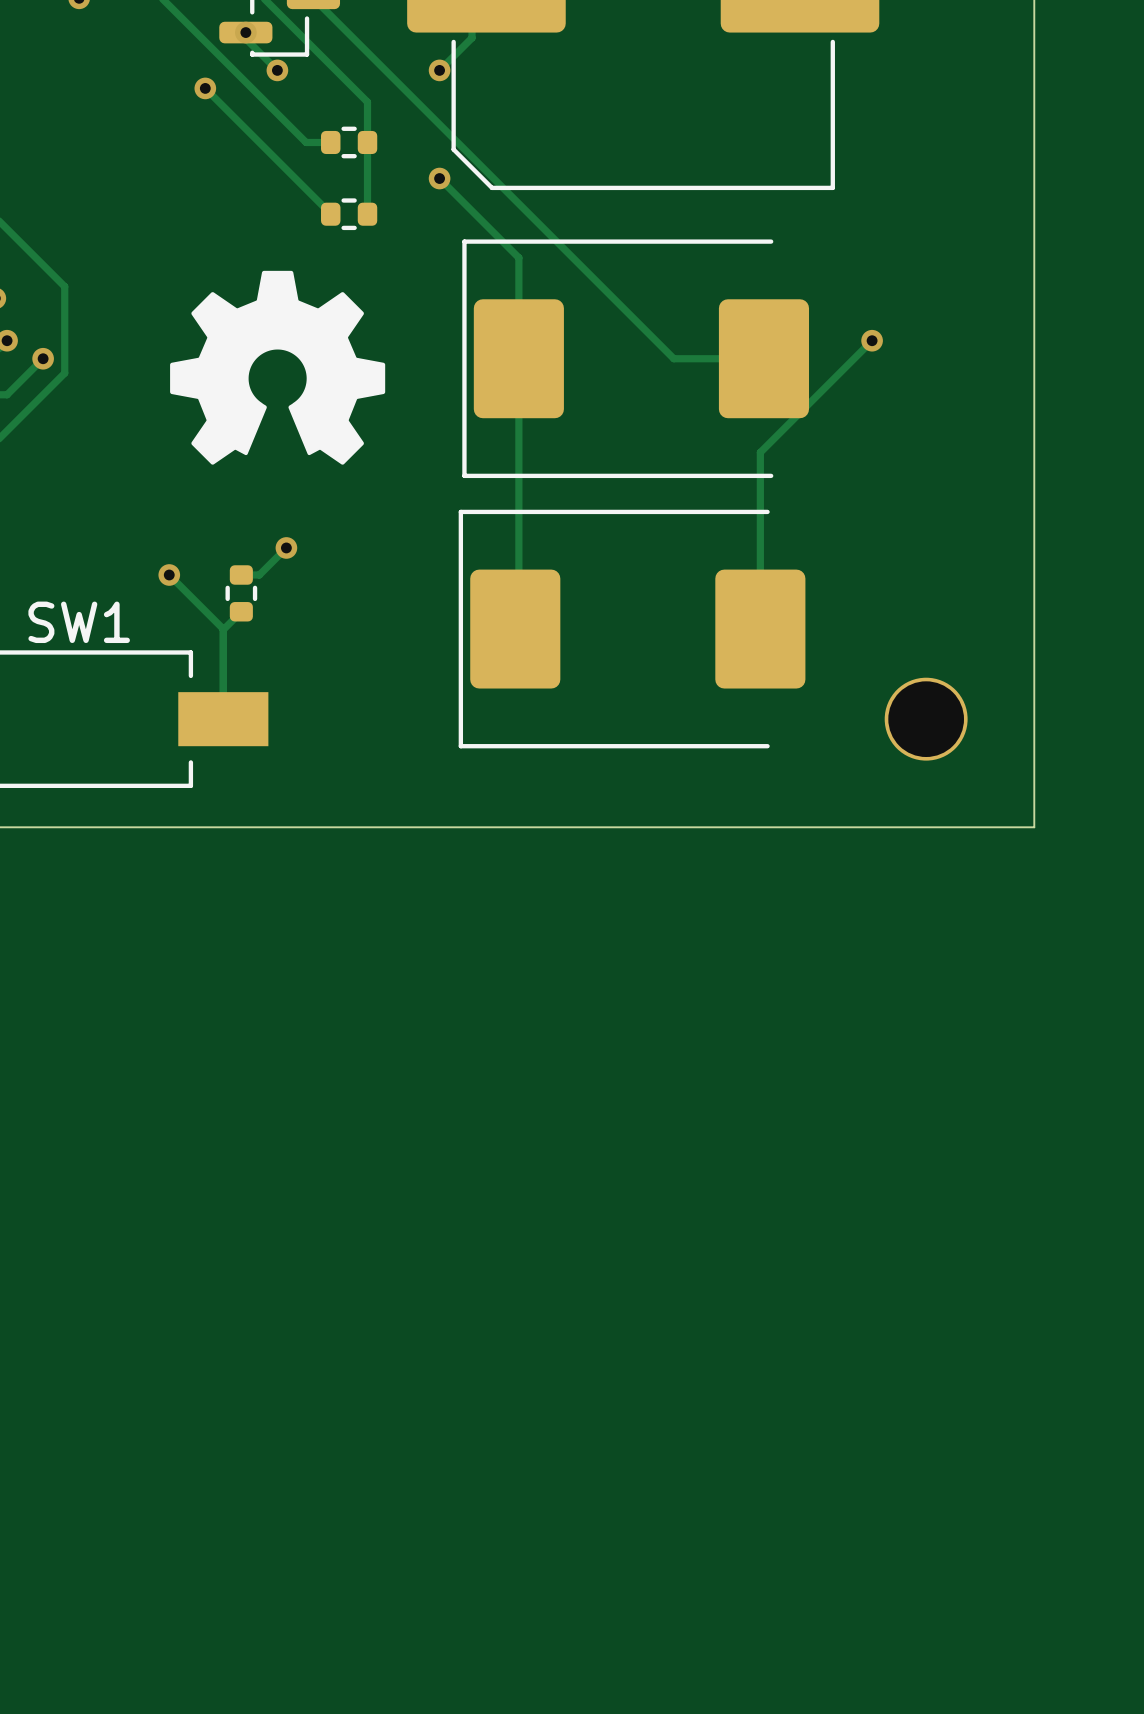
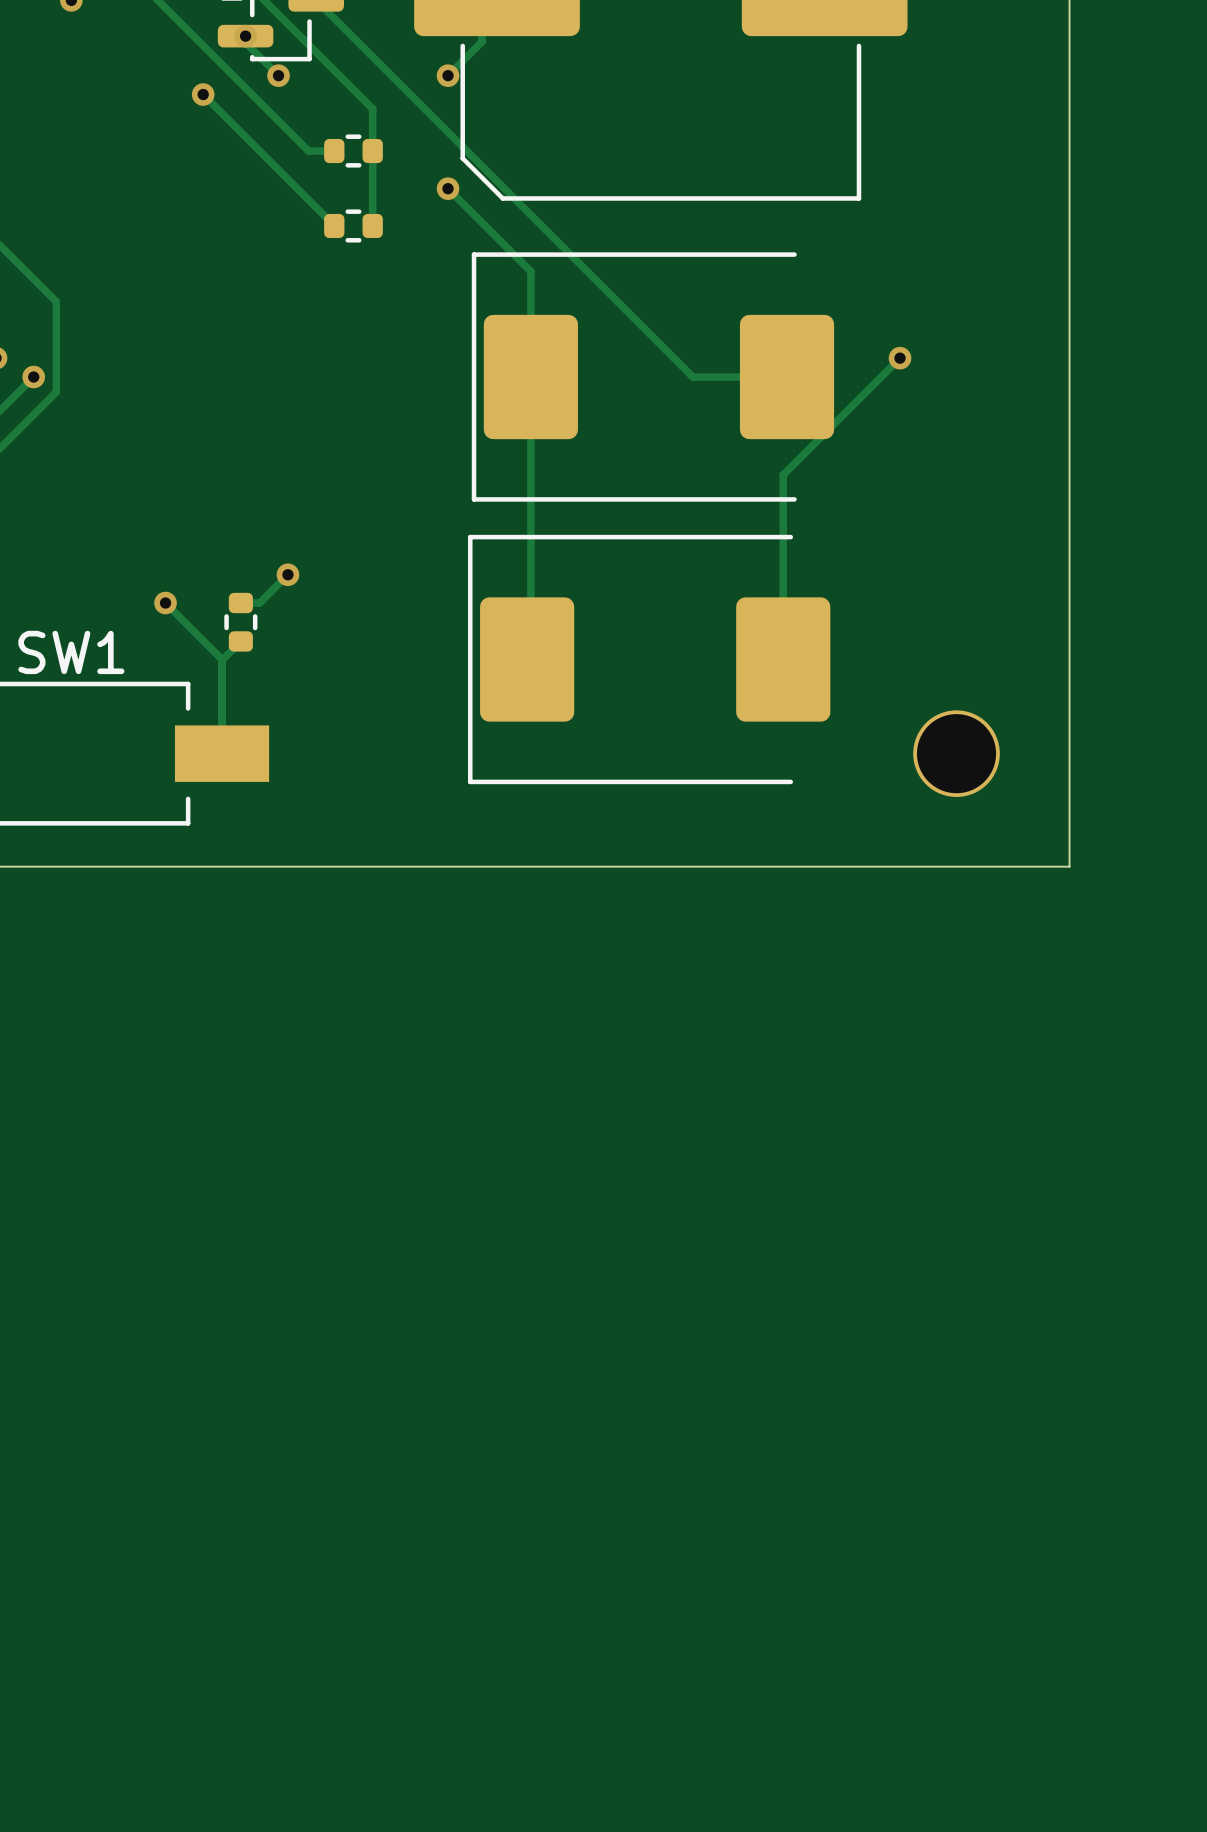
drawing: [170, 270, 386, 465] -> none

